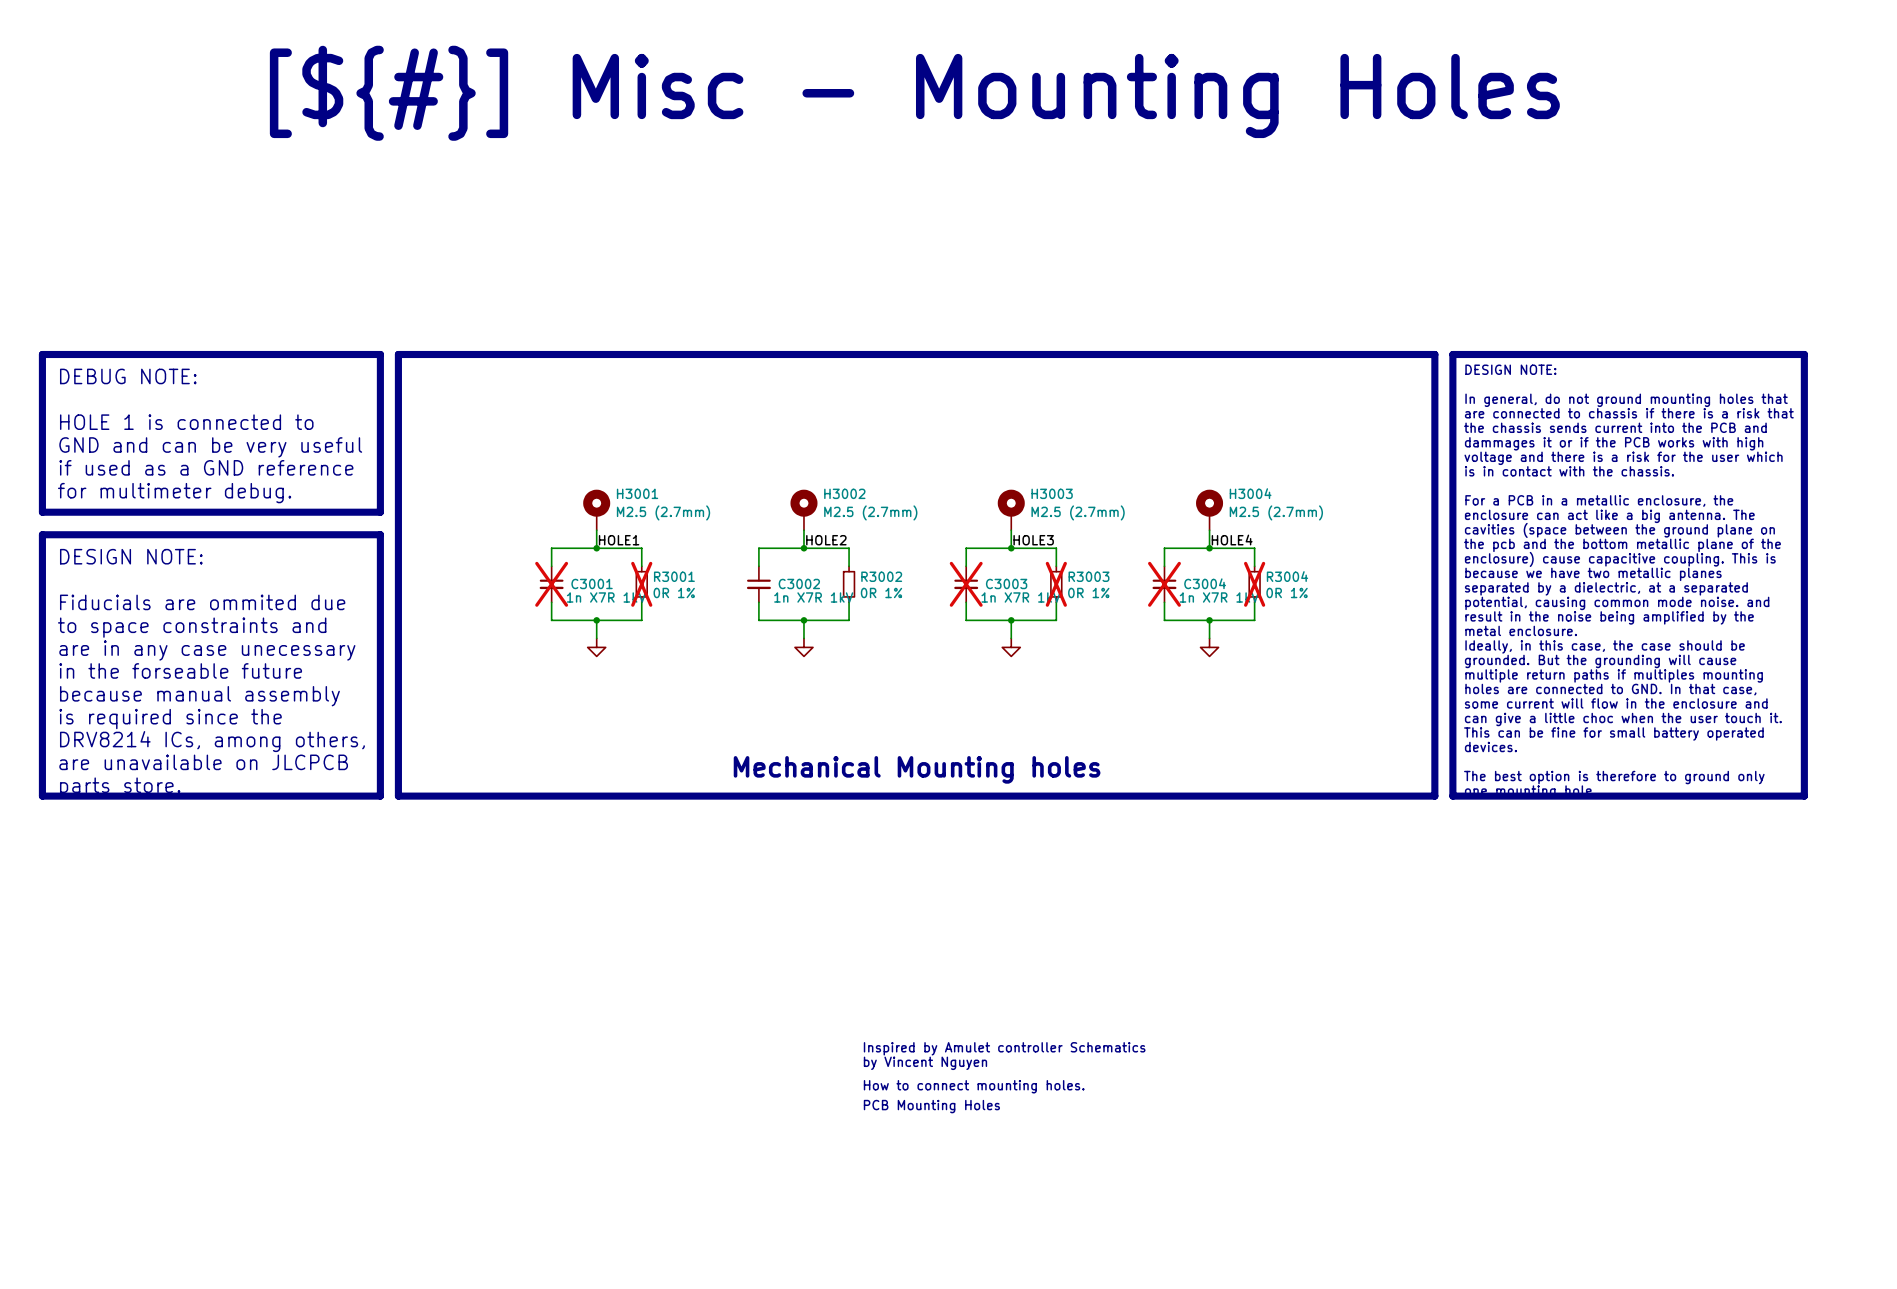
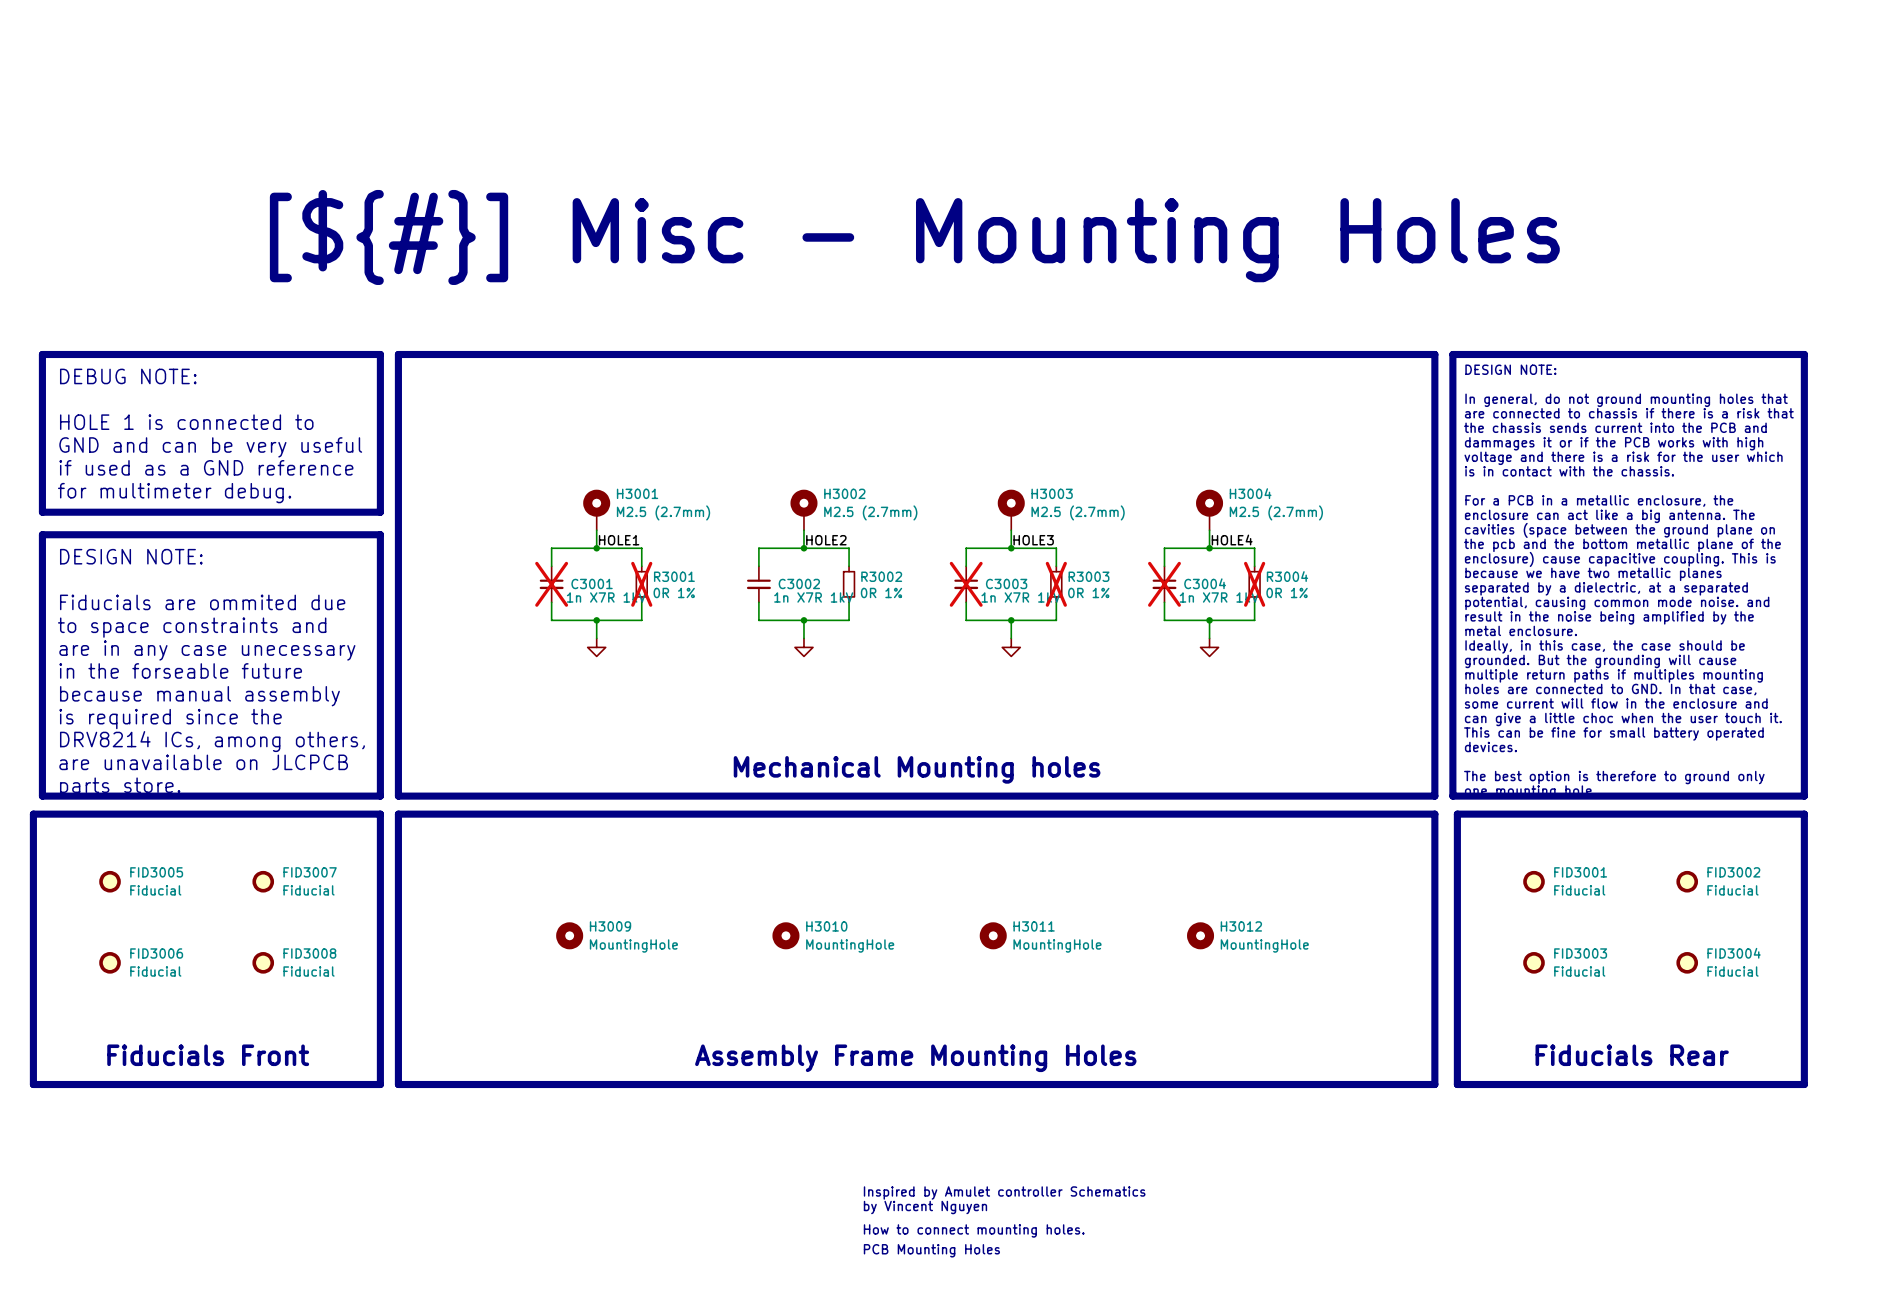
text position: [${#}] Misc - Mounting Holes (914, 93) -> [${#}] Misc - Mounting Holes (914, 237)
line: none -> (33, 814) (380, 814) (380, 1084) (33, 1084) (33, 814)
line: none -> (398, 814) (1434, 814) (1434, 1084) (398, 1084) (398, 814)
line: none -> (1457, 814) (1804, 814) (1804, 1084) (1457, 1084) (1457, 814)
FID3005: none -> Fiducial (110, 881)
FID3007: none -> Fiducial (263, 881)
FID3001: none -> Fiducial (1533, 881)
FID3002: none -> Fiducial (1687, 881)
H3009: none -> MountingHole (569, 935)
H3010: none -> MountingHole (785, 935)
H3011: none -> MountingHole (993, 935)
H3012: none -> MountingHole (1200, 935)
FID3006: none -> Fiducial (110, 962)
FID3008: none -> Fiducial (263, 962)
FID3003: none -> Fiducial (1533, 962)
FID3004: none -> Fiducial (1687, 962)
text position: Inspired by Amulet controller Schematics (1004, 1048) -> Inspired by Amulet controller Schematics (1004, 1192)
text: none -> Fiducials Front (208, 1055)
text: none -> Fiducials Rear (1632, 1055)
text: none -> Assembly Frame Mounting Holes (915, 1058)
text position: by Vincent Nguyen (925, 1063) -> by Vincent Nguyen (925, 1207)
text position: How to connect mounting holes. (974, 1086) -> How to connect mounting holes. (974, 1230)
text position: PCB Mounting Holes (931, 1106) -> PCB Mounting Holes (931, 1250)

